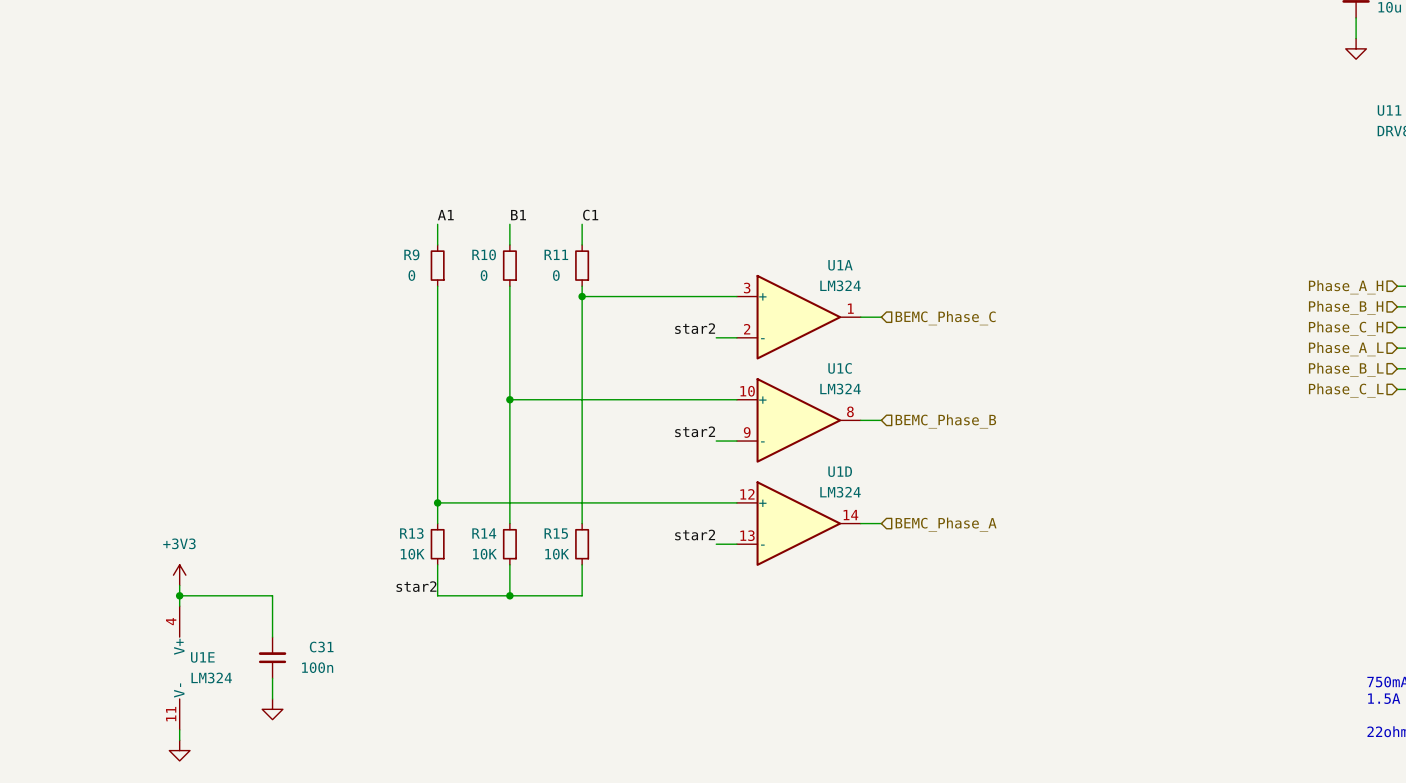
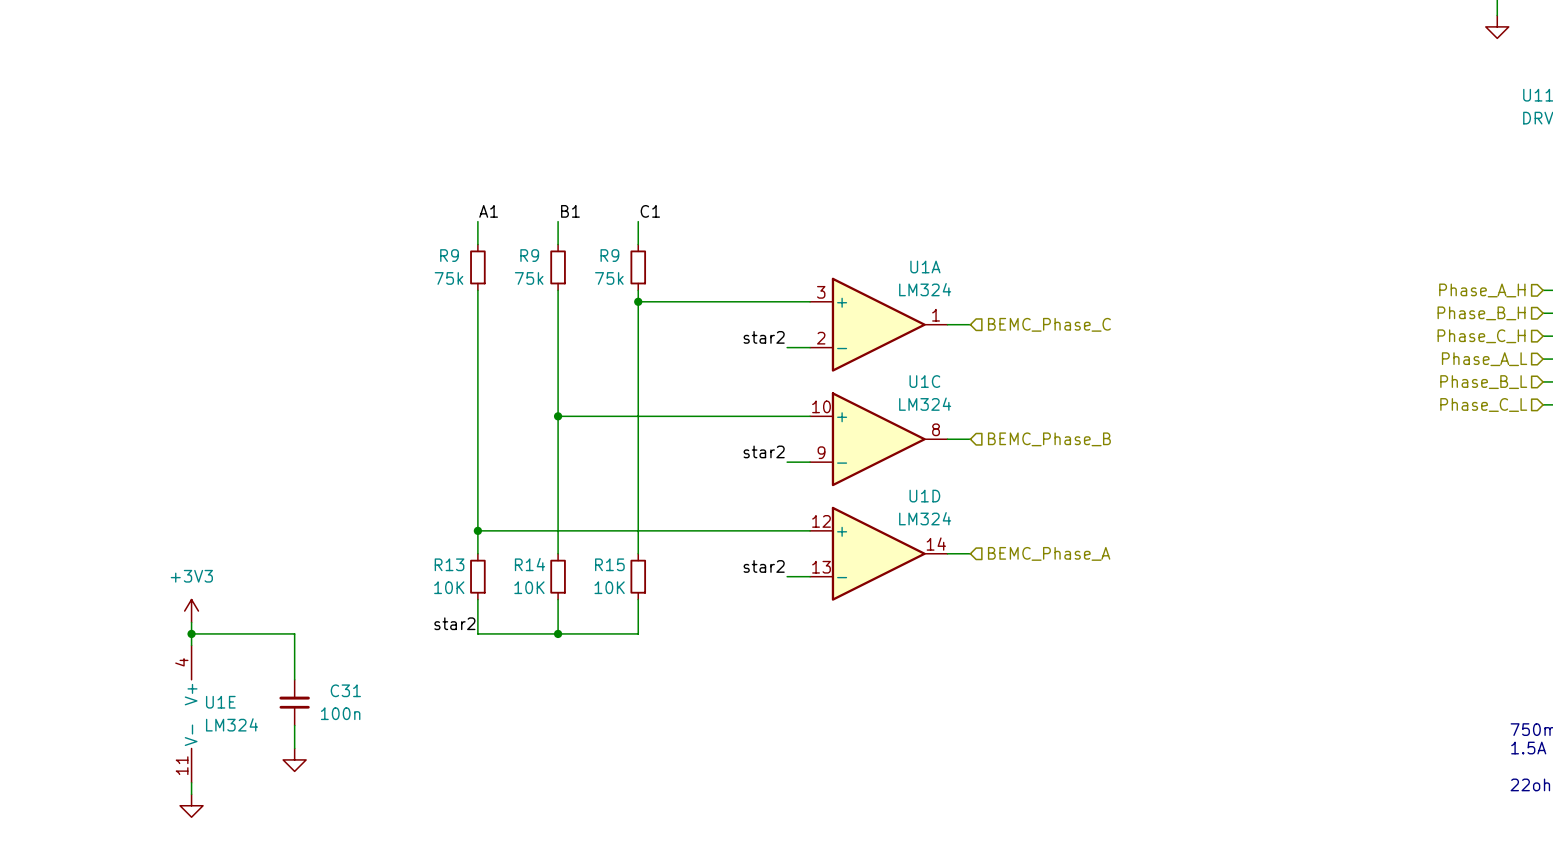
R10 name: R10 (484, 254) -> R9 (529, 255)
R11 name: R11 (556, 254) -> R9 (609, 255)
R9 value: 0 (411, 275) -> 75k (448, 278)
R10 value: 0 (484, 275) -> 75k (529, 278)
R11 value: 0 (556, 275) -> 75k (609, 278)

